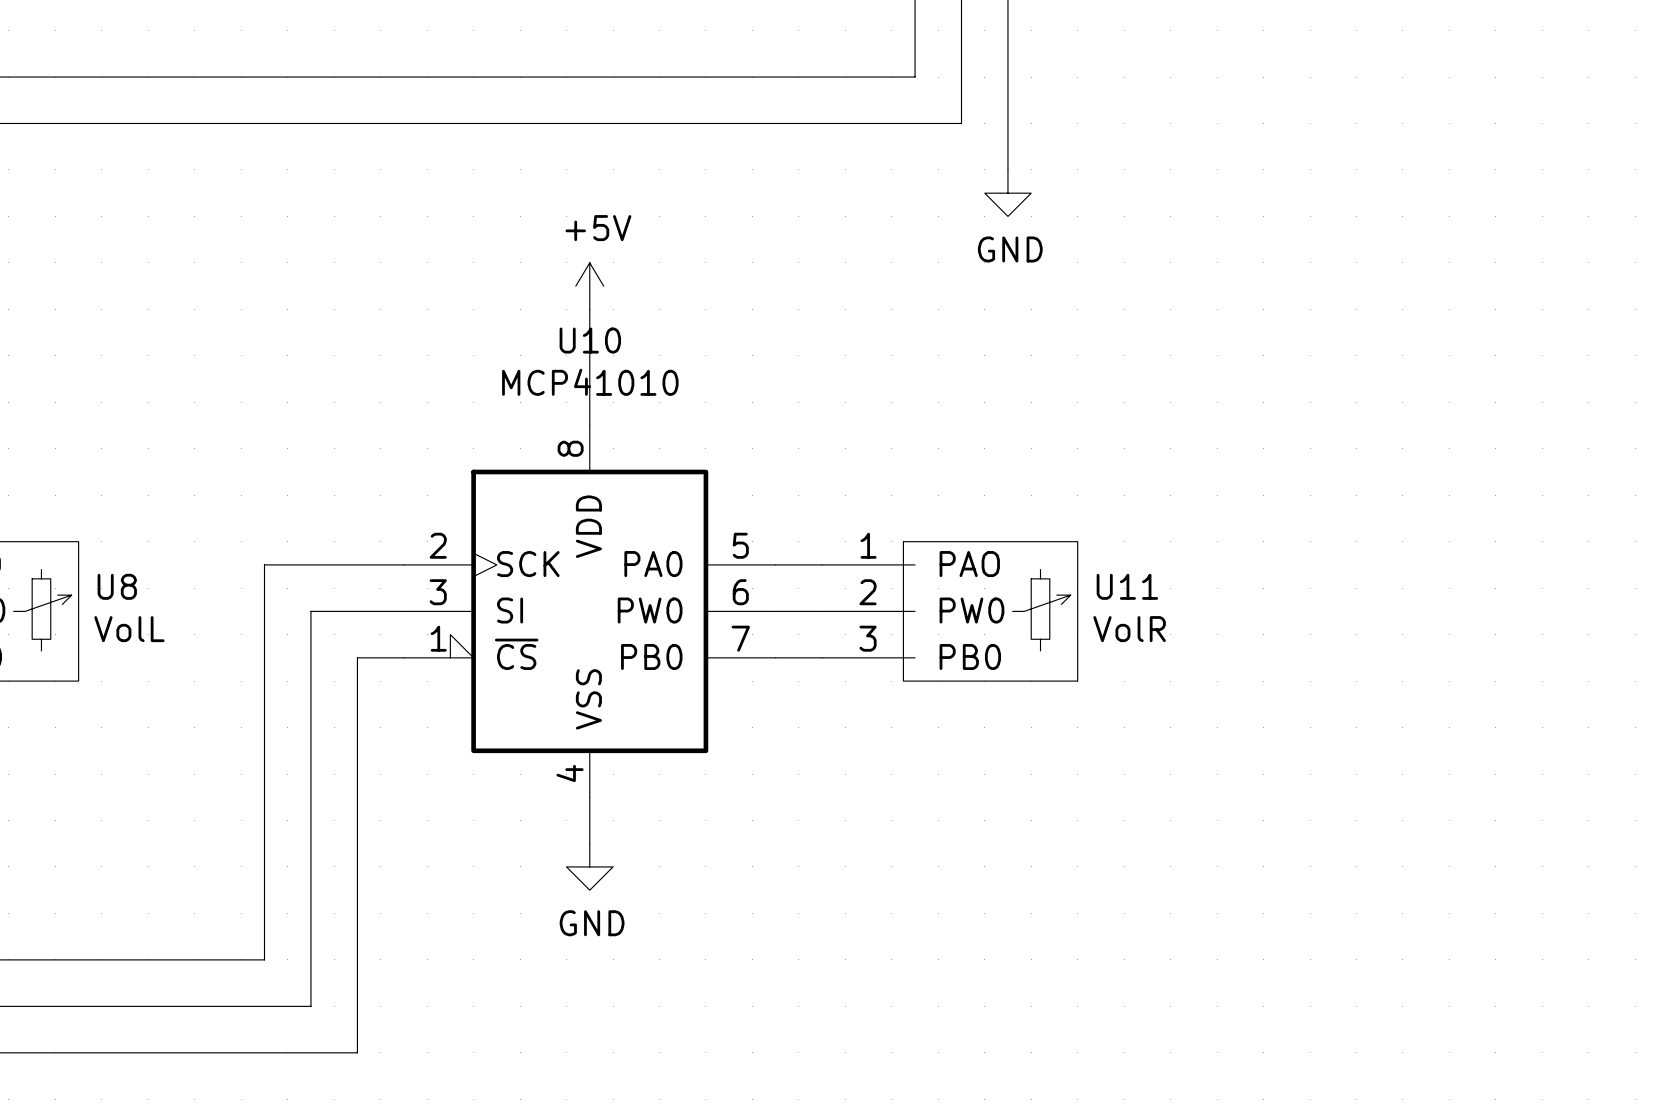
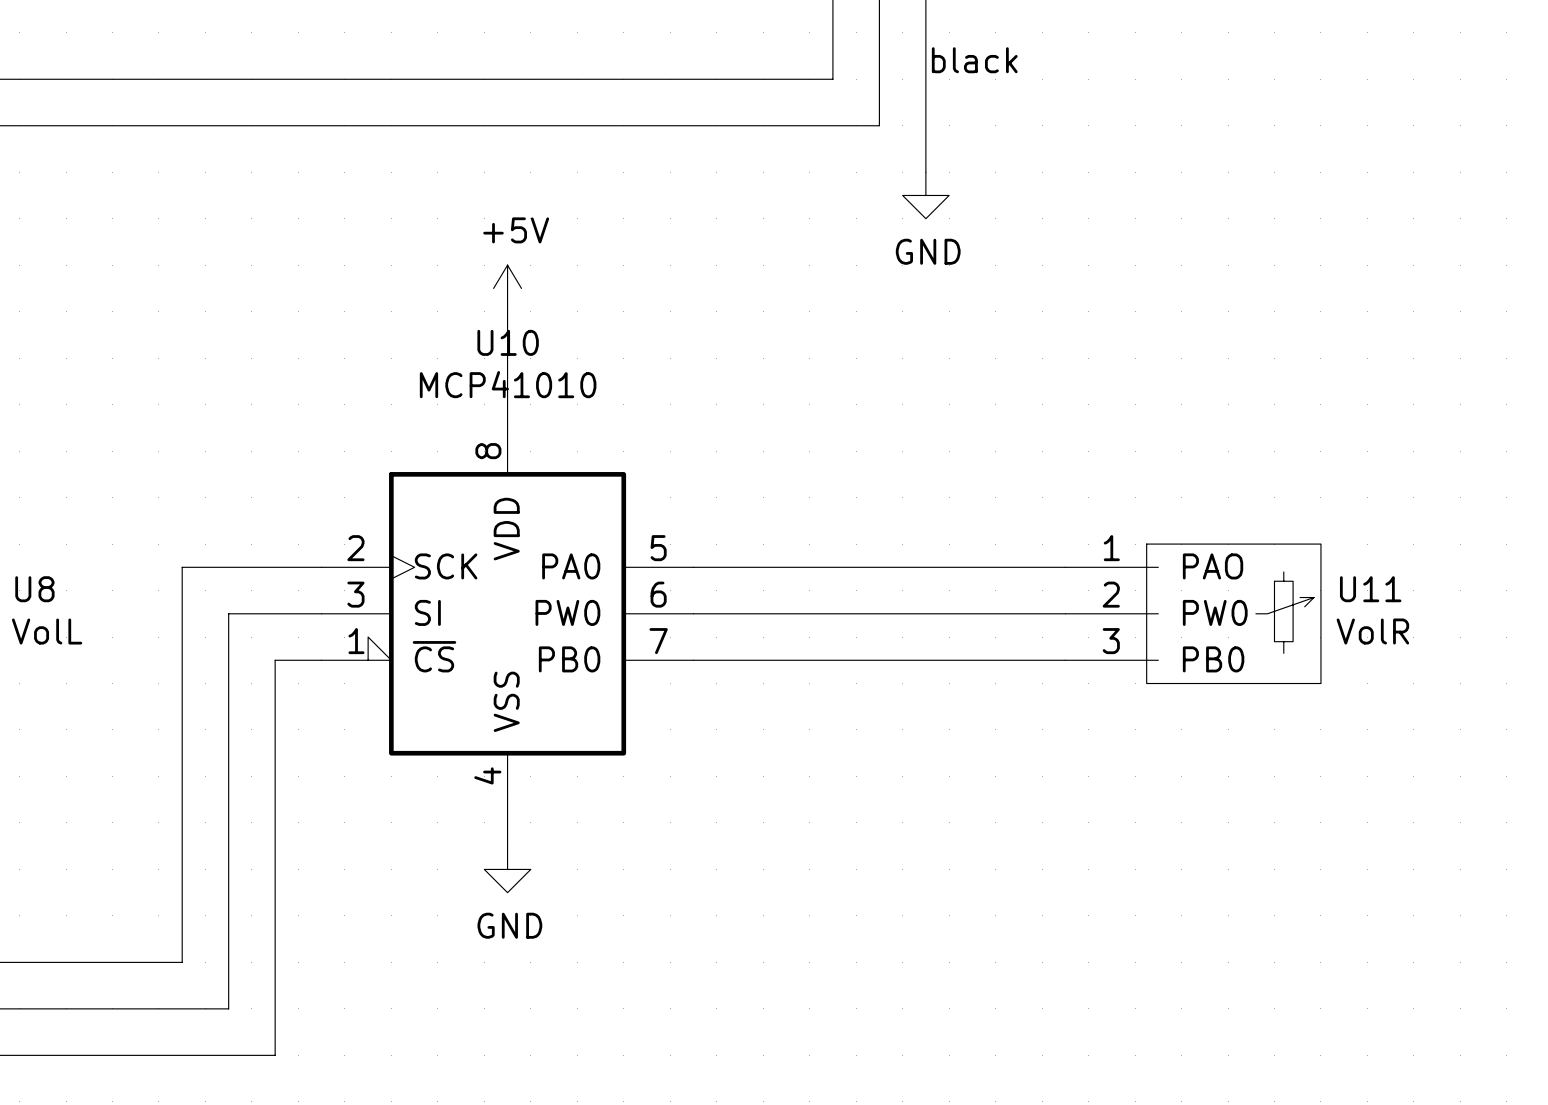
text: none -> black (974, 60)
wire: none -> (739, 567) (1065, 567)
wire: none -> (739, 613) (1065, 613)
U11 position: (949, 611) -> (1193, 613)
wire: none -> (739, 660) (1065, 660)

